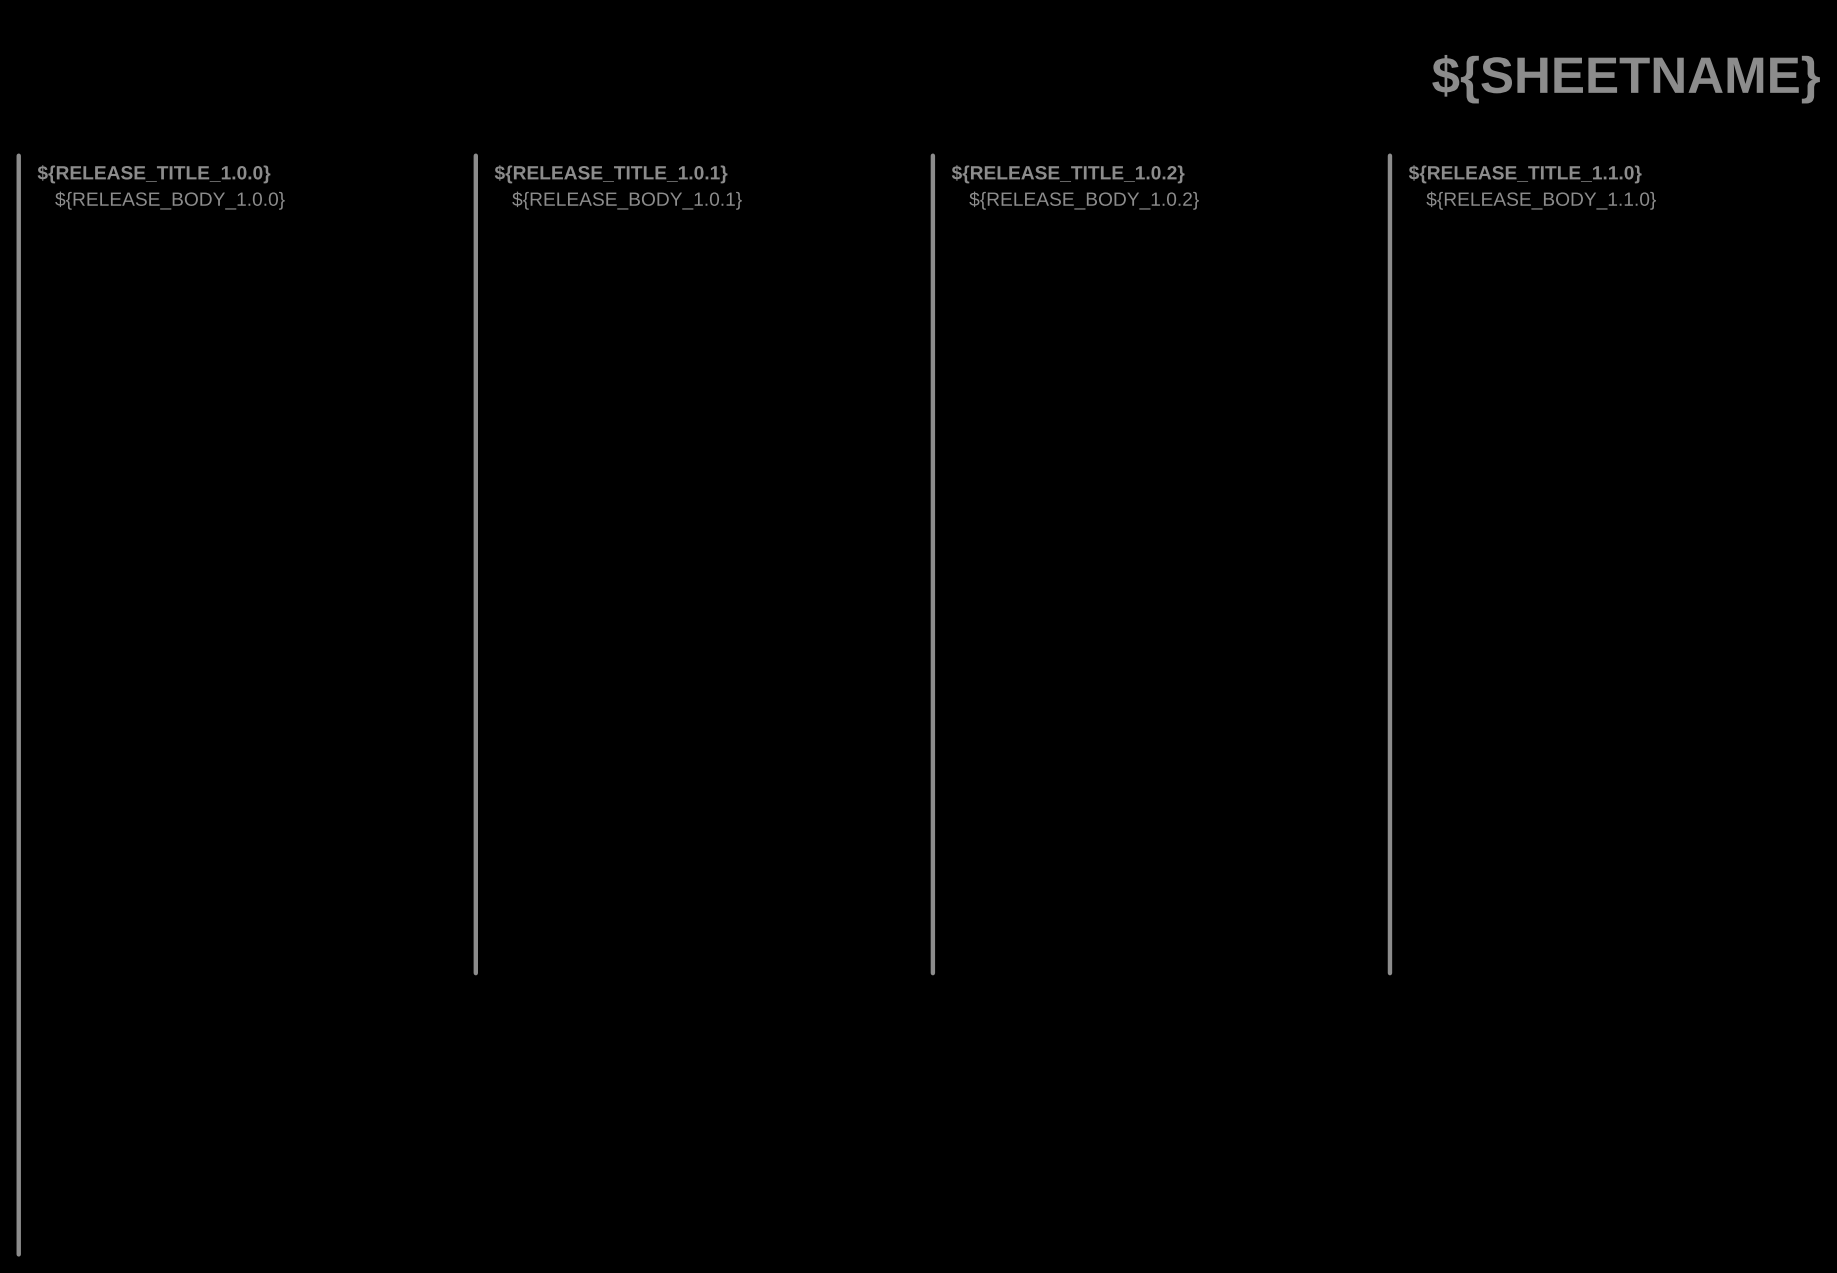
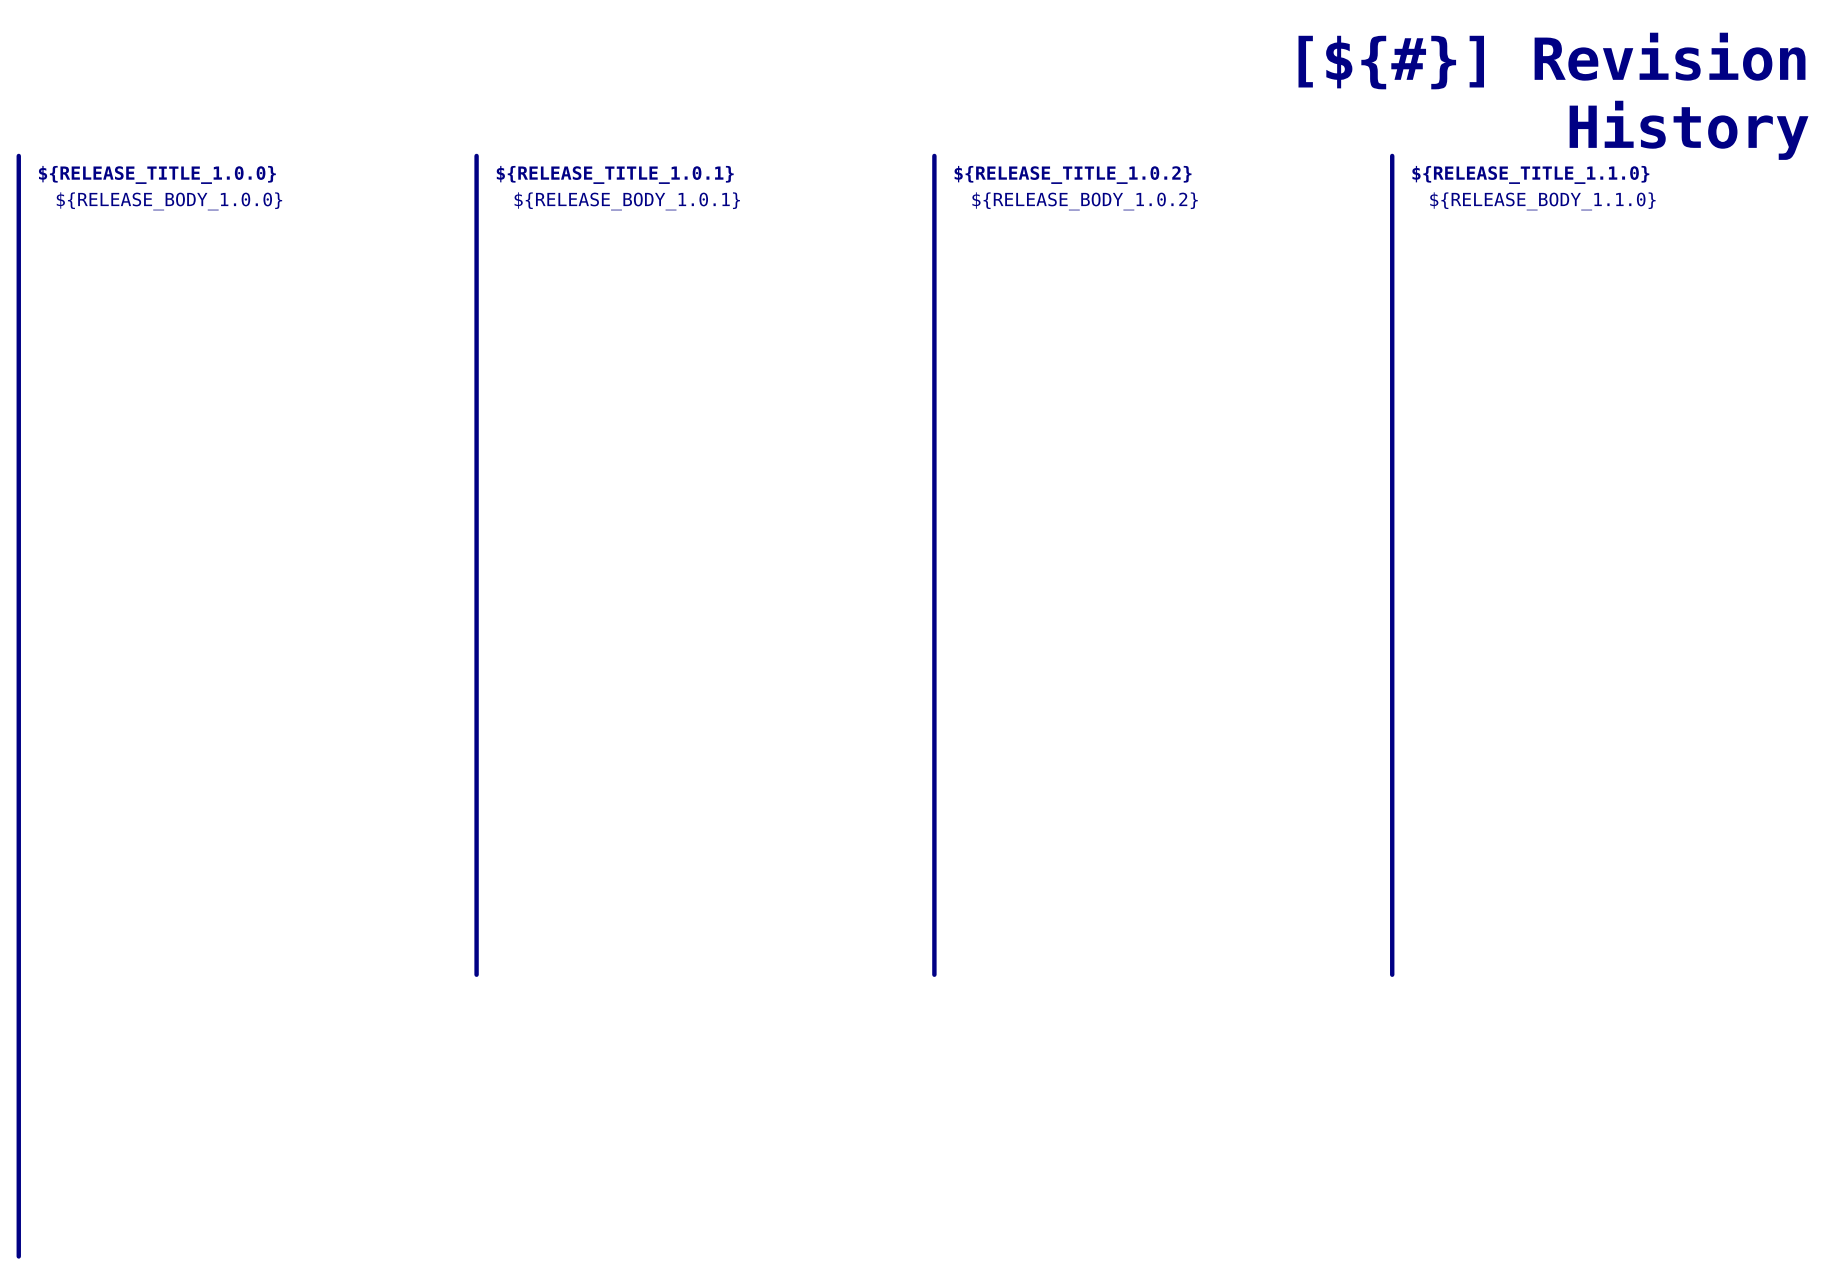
text: none -> [${#}] Revision (1551, 61)
text: ${SHEETNAME} (1626, 79) -> none
text: none -> History (1689, 130)

